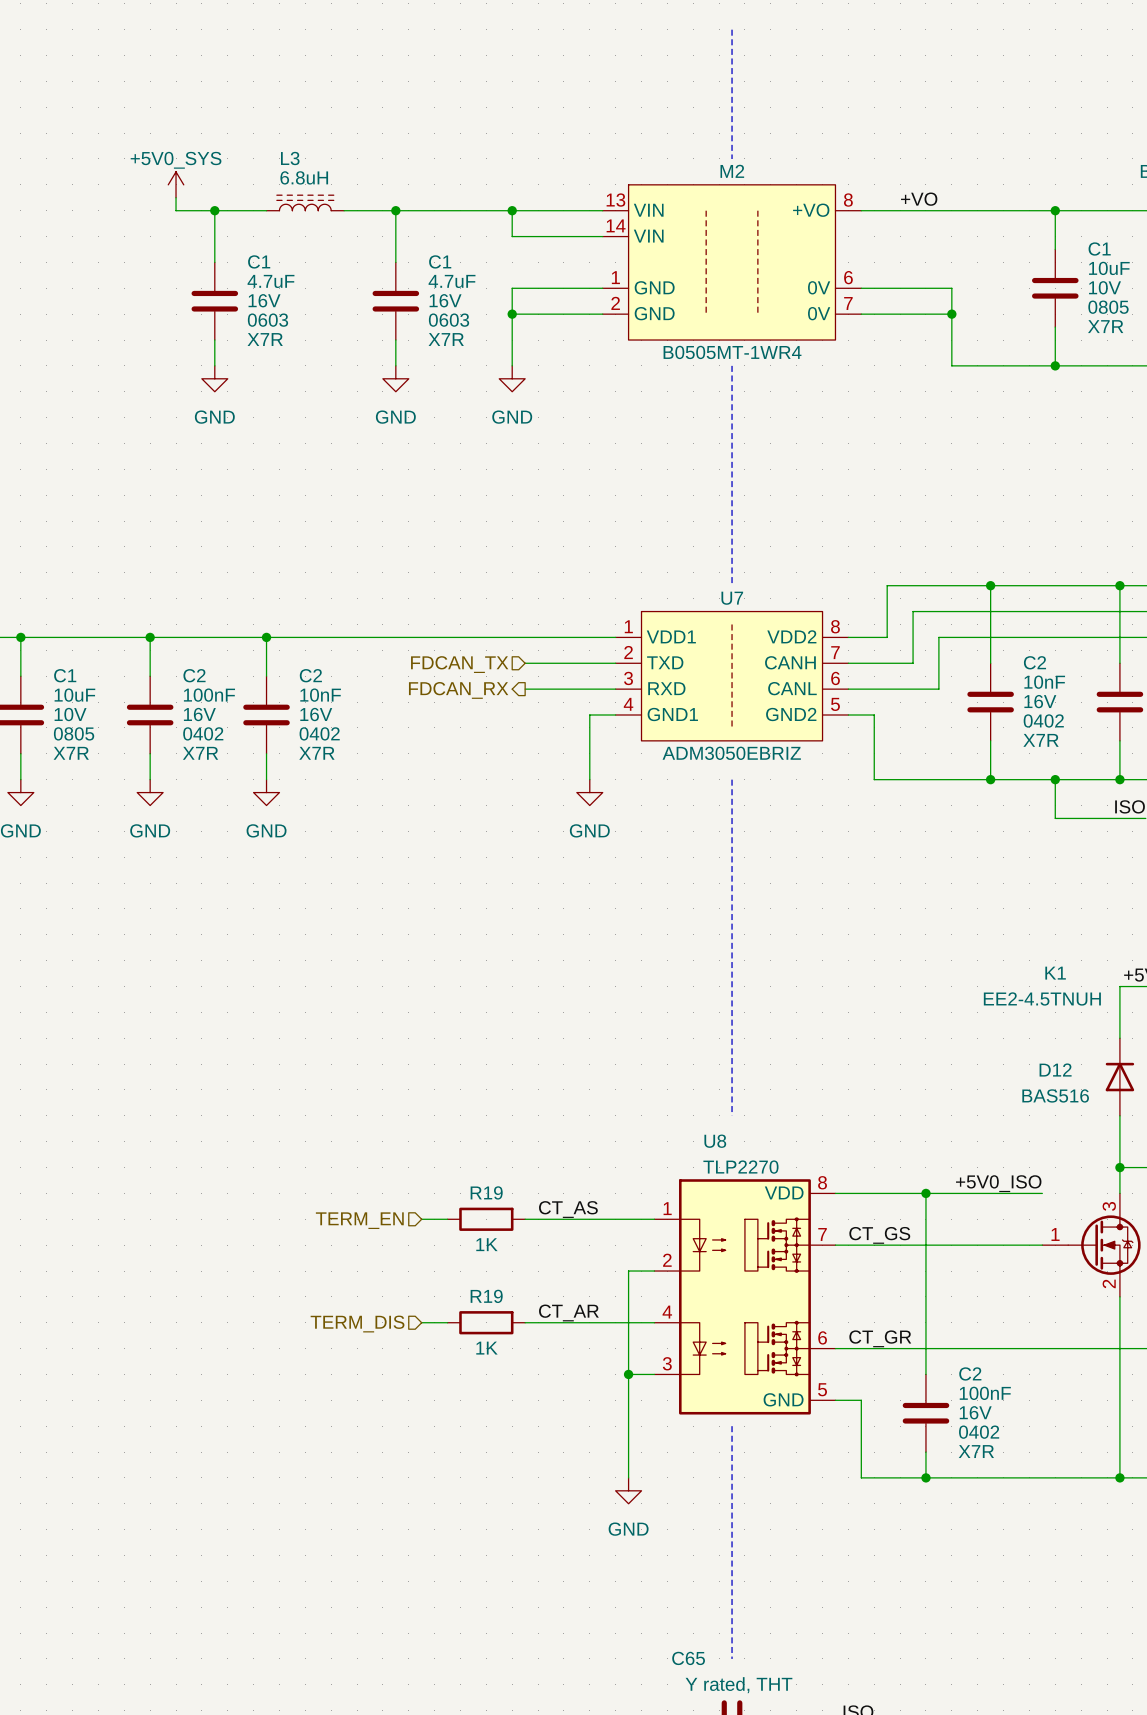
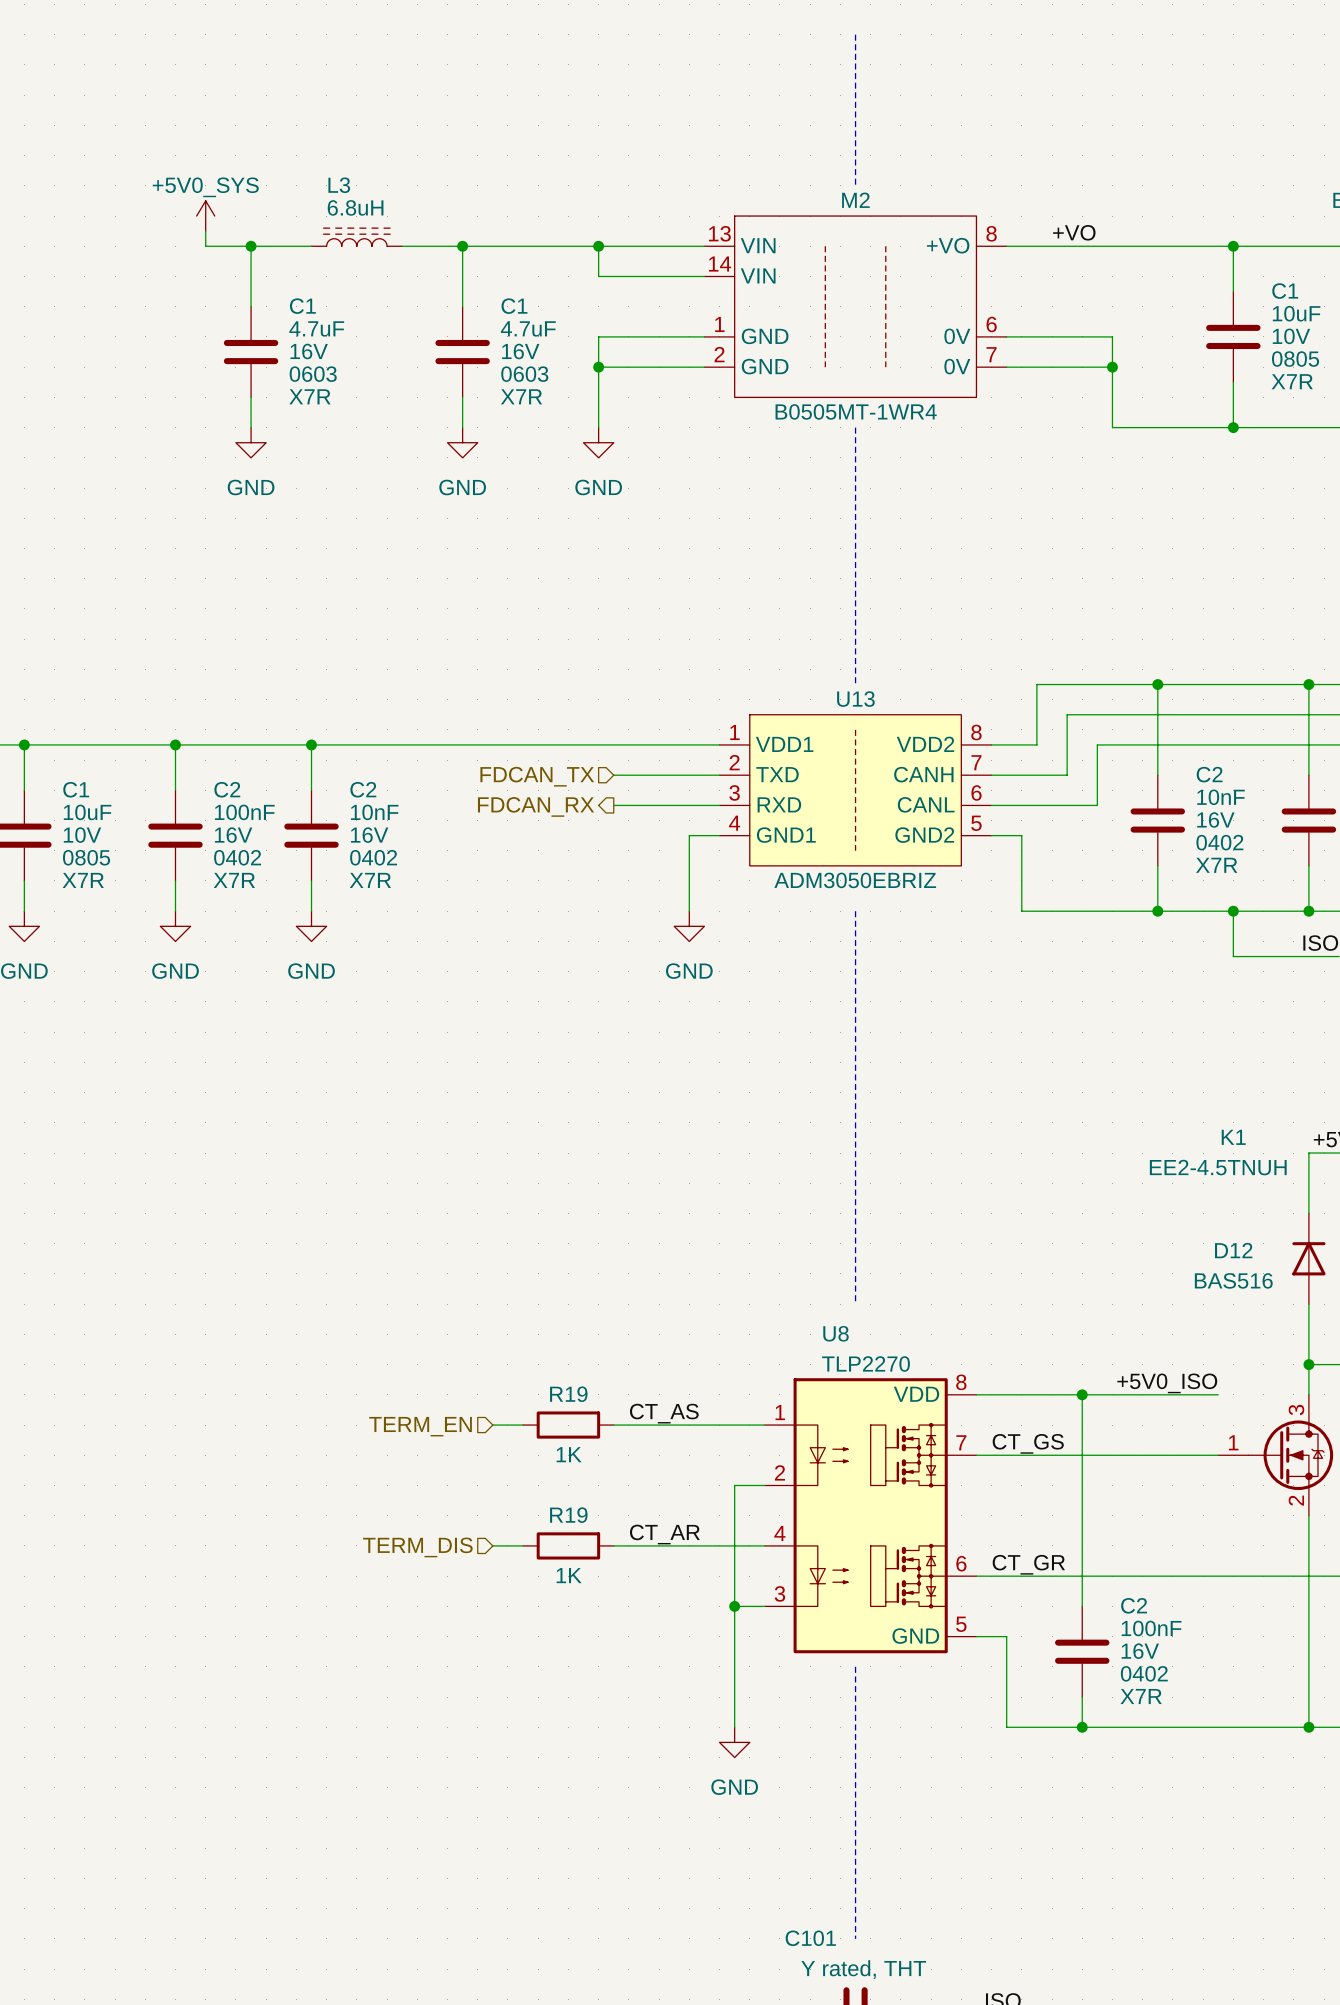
M2 symbol: [602, 184, 862, 341] -> [704, 216, 1007, 398]
U7 name: U7 (732, 598) -> U13 (855, 699)
C65 name: C65 (688, 1658) -> C101 (810, 1938)

